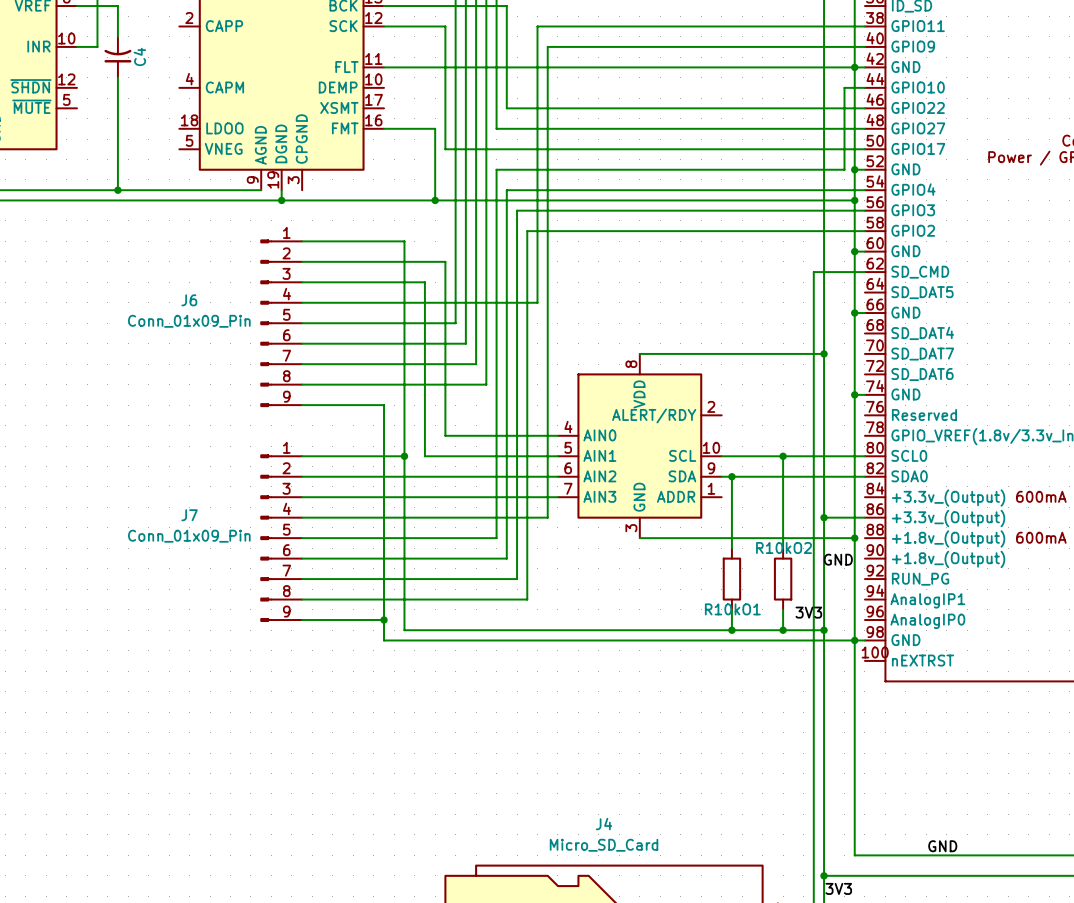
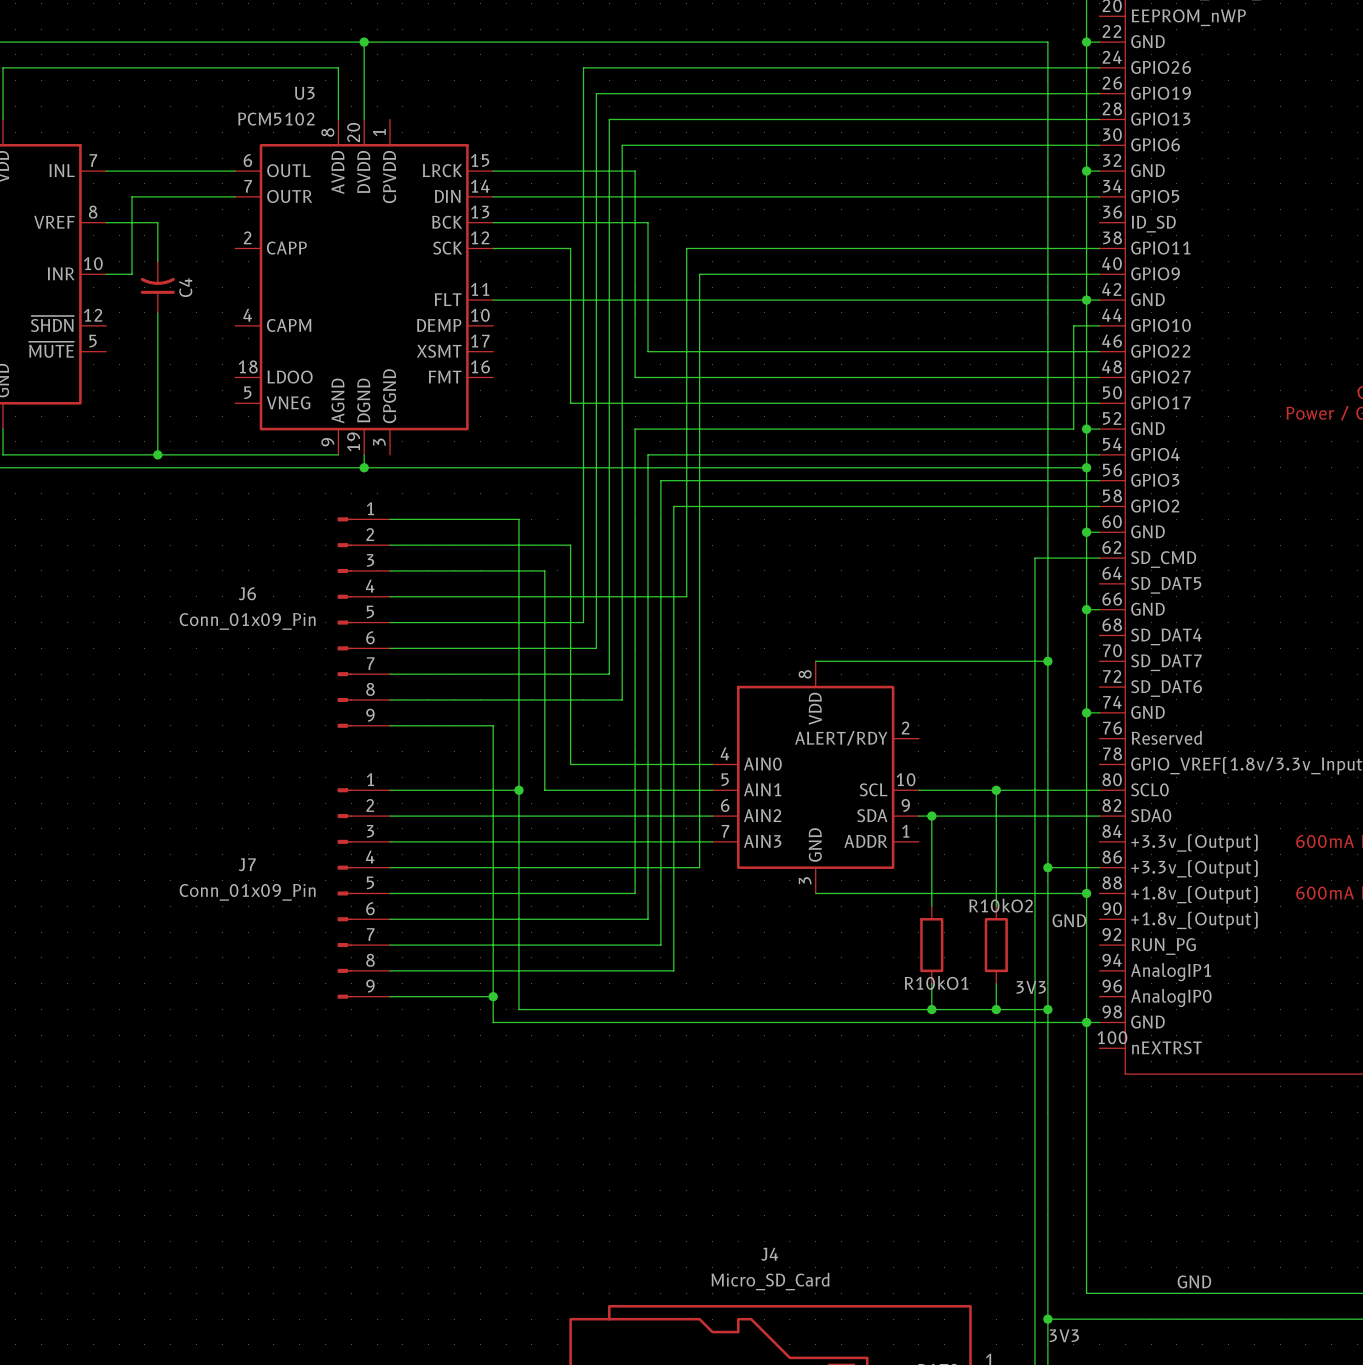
wire: (384, 128) (435, 128) (435, 200) -> none
junction: (435, 200) -> none

